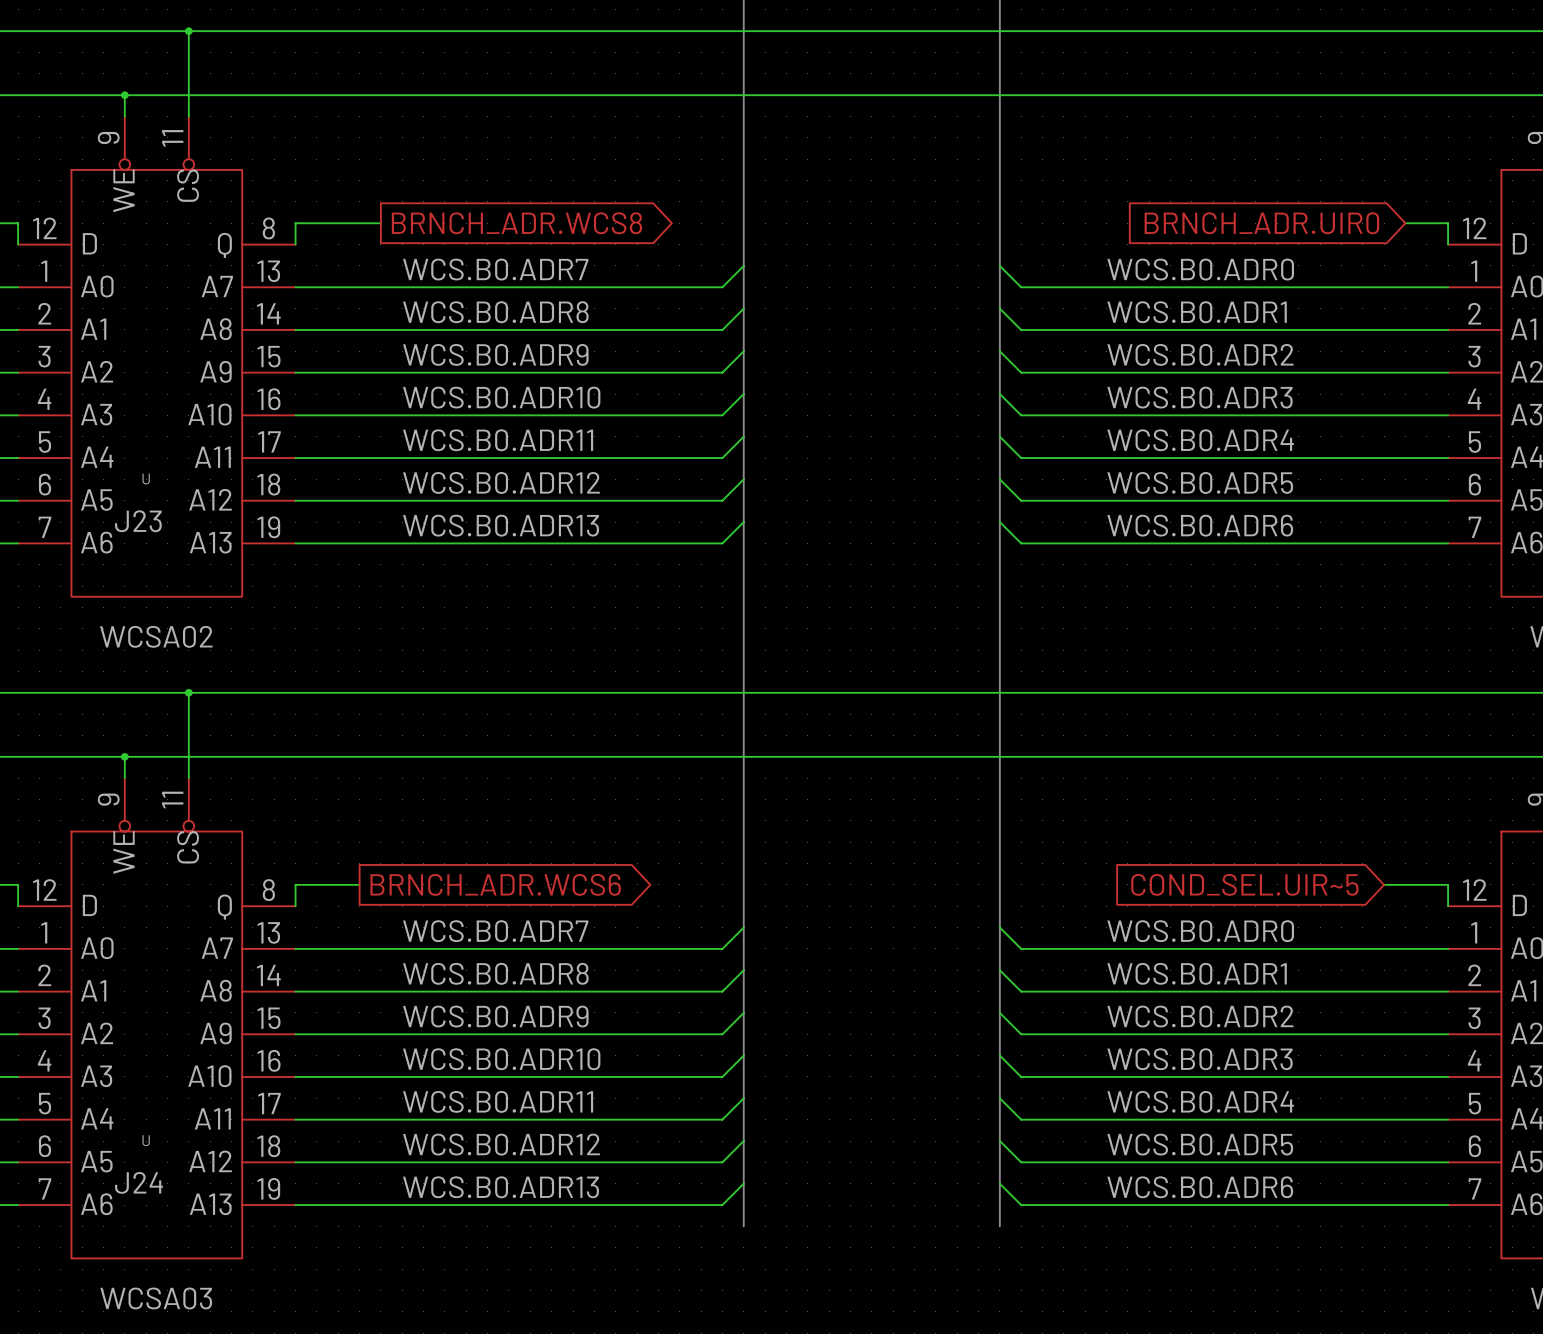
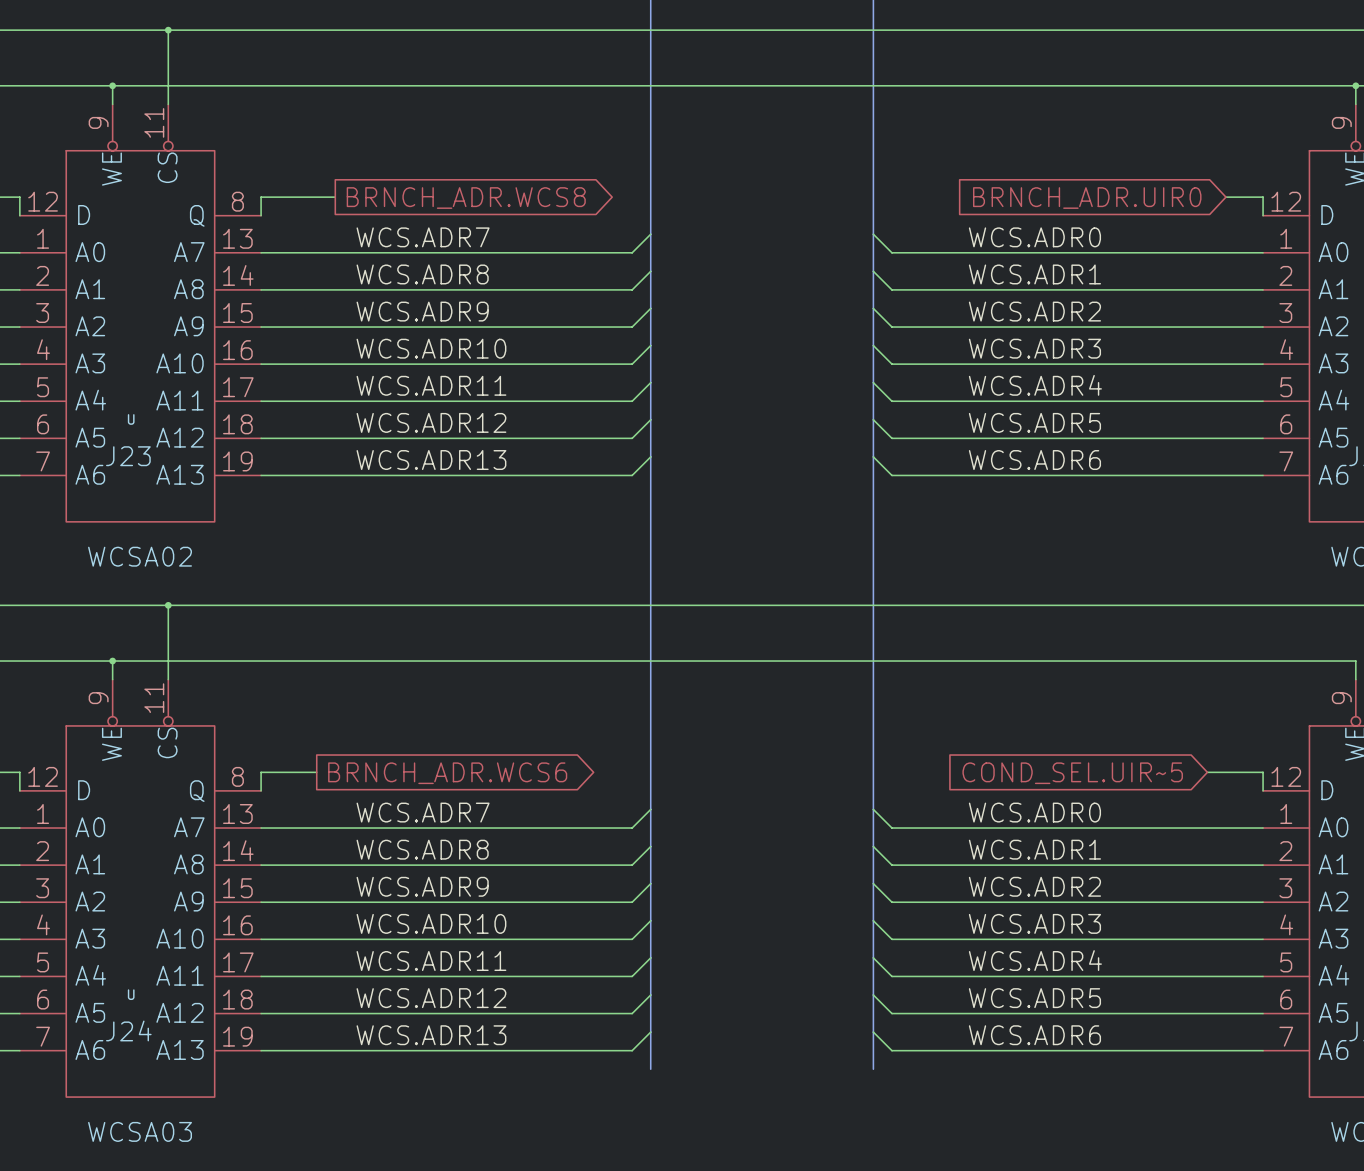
label: WCS.B0.ADR7 (495, 269) -> WCS.ADR7 (423, 237)
label: WCS.B0.ADR0 (1200, 269) -> WCS.ADR0 (1034, 237)
label: WCS.B0.ADR8 (495, 312) -> WCS.ADR8 (422, 274)
label: WCS.B0.ADR1 (1197, 312) -> WCS.ADR1 (1034, 274)
label: WCS.B0.ADR9 (495, 354) -> WCS.ADR9 (422, 311)
label: WCS.B0.ADR2 (1200, 354) -> WCS.ADR2 (1034, 311)
label: WCS.B0.ADR10 (501, 397) -> WCS.ADR10 (431, 348)
label: WCS.B0.ADR3 (1200, 397) -> WCS.ADR3 (1034, 348)
label: WCS.B0.ADR11 (498, 440) -> WCS.ADR11 (431, 385)
label: WCS.B0.ADR4 (1200, 440) -> WCS.ADR4 (1035, 385)
label: WCS.B0.ADR12 (501, 482) -> WCS.ADR12 (431, 422)
label: WCS.B0.ADR5 (1200, 482) -> WCS.ADR5 (1034, 422)
label: WCS.B0.ADR13 (501, 525) -> WCS.ADR13 (431, 460)
label: WCS.B0.ADR6 (1200, 525) -> WCS.ADR6 (1034, 460)
label: WCS.B0.ADR7 (495, 931) -> WCS.ADR7 (423, 812)
label: WCS.B0.ADR0 (1200, 931) -> WCS.ADR0 (1034, 812)
label: WCS.B0.ADR8 (495, 973) -> WCS.ADR8 (422, 849)
label: WCS.B0.ADR1 (1197, 973) -> WCS.ADR1 (1034, 849)
label: WCS.B0.ADR9 (495, 1016) -> WCS.ADR9 (422, 886)
label: WCS.B0.ADR2 (1200, 1016) -> WCS.ADR2 (1034, 886)
label: WCS.B0.ADR10 (501, 1059) -> WCS.ADR10 (431, 923)
label: WCS.B0.ADR3 (1200, 1059) -> WCS.ADR3 (1034, 923)
label: WCS.B0.ADR11 (498, 1101) -> WCS.ADR11 (431, 961)
label: WCS.B0.ADR4 (1200, 1101) -> WCS.ADR4 (1035, 960)
label: WCS.B0.ADR12 (501, 1144) -> WCS.ADR12 (431, 998)
label: WCS.B0.ADR5 (1200, 1144) -> WCS.ADR5 (1034, 998)
label: WCS.B0.ADR13 (501, 1187) -> WCS.ADR13 (431, 1035)
label: WCS.B0.ADR6 (1200, 1187) -> WCS.ADR6 (1034, 1035)

